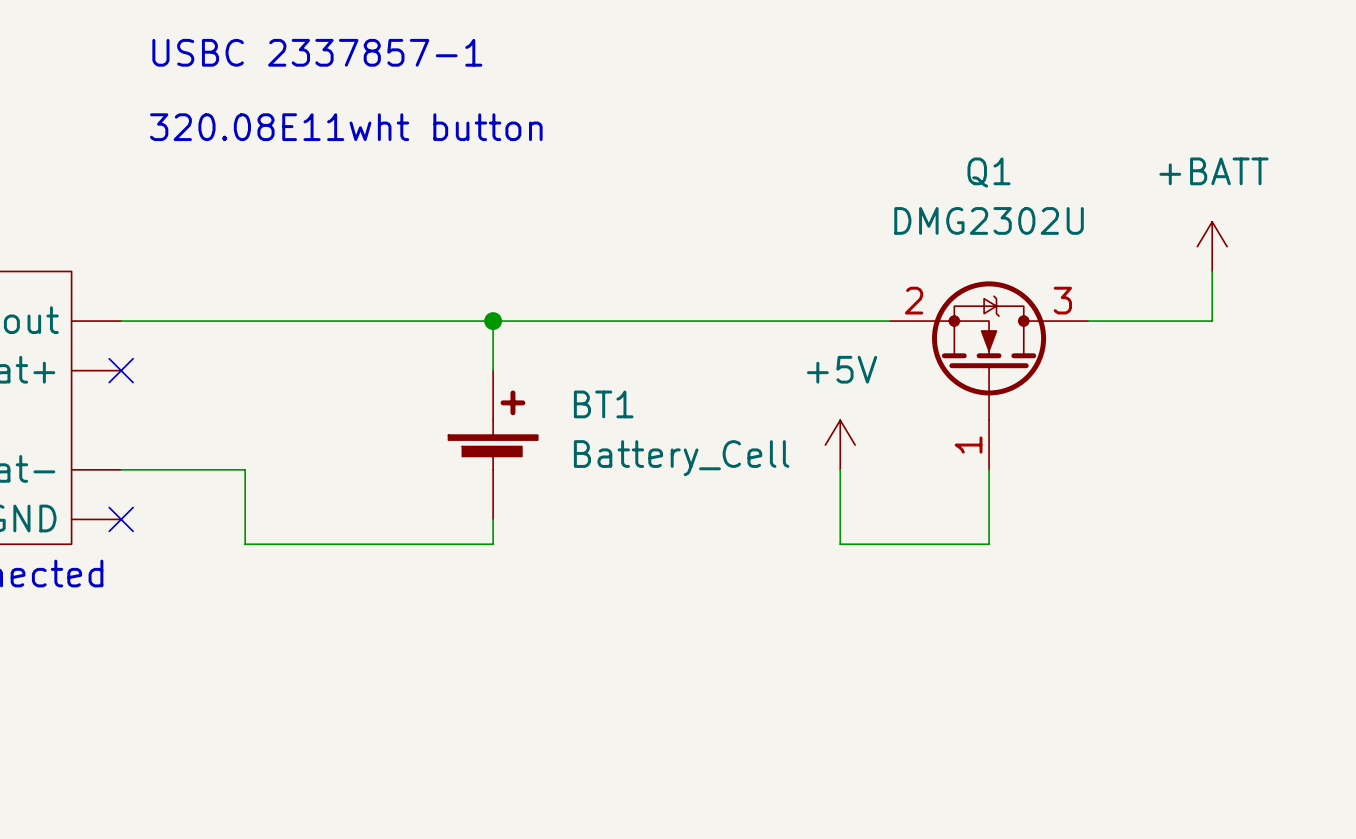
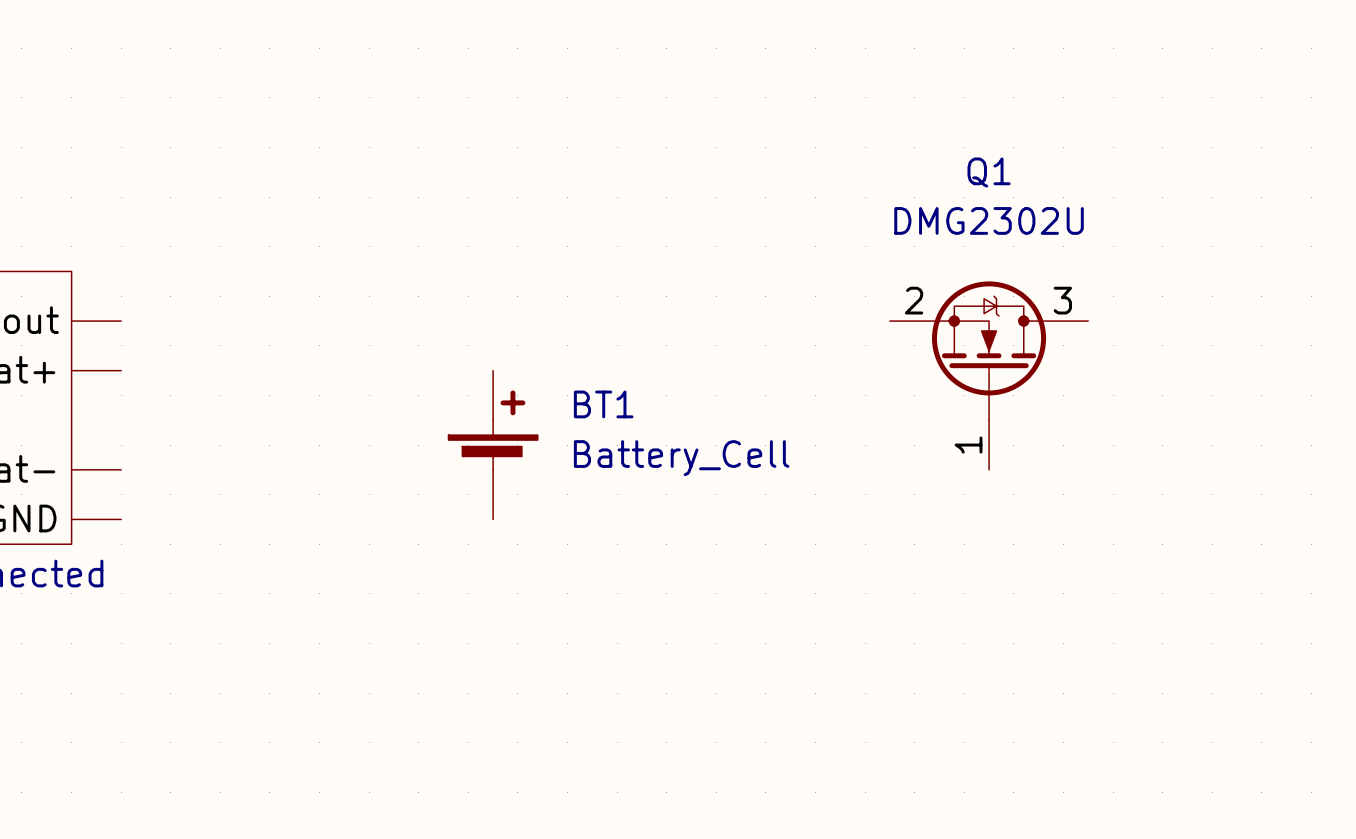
text: USBC 2337857-1 (317, 52) -> none
text: 320.08E11wht button (346, 127) -> none
power symbol: +BATT (1212, 246) -> none
wire: (1212, 271) (1212, 321) (1088, 321) -> none
wire: (121, 321) (889, 321) -> none
wire: (493, 321) (493, 370) -> none
junction: (493, 321) -> none
no-connect mark: (121, 370) -> none
power symbol: +5V (840, 445) -> none
wire: (121, 469) (245, 469) (245, 544) (493, 544) (493, 519) -> none
wire: (840, 469) (840, 544) (989, 544) (989, 469) -> none
no-connect mark: (121, 519) -> none

